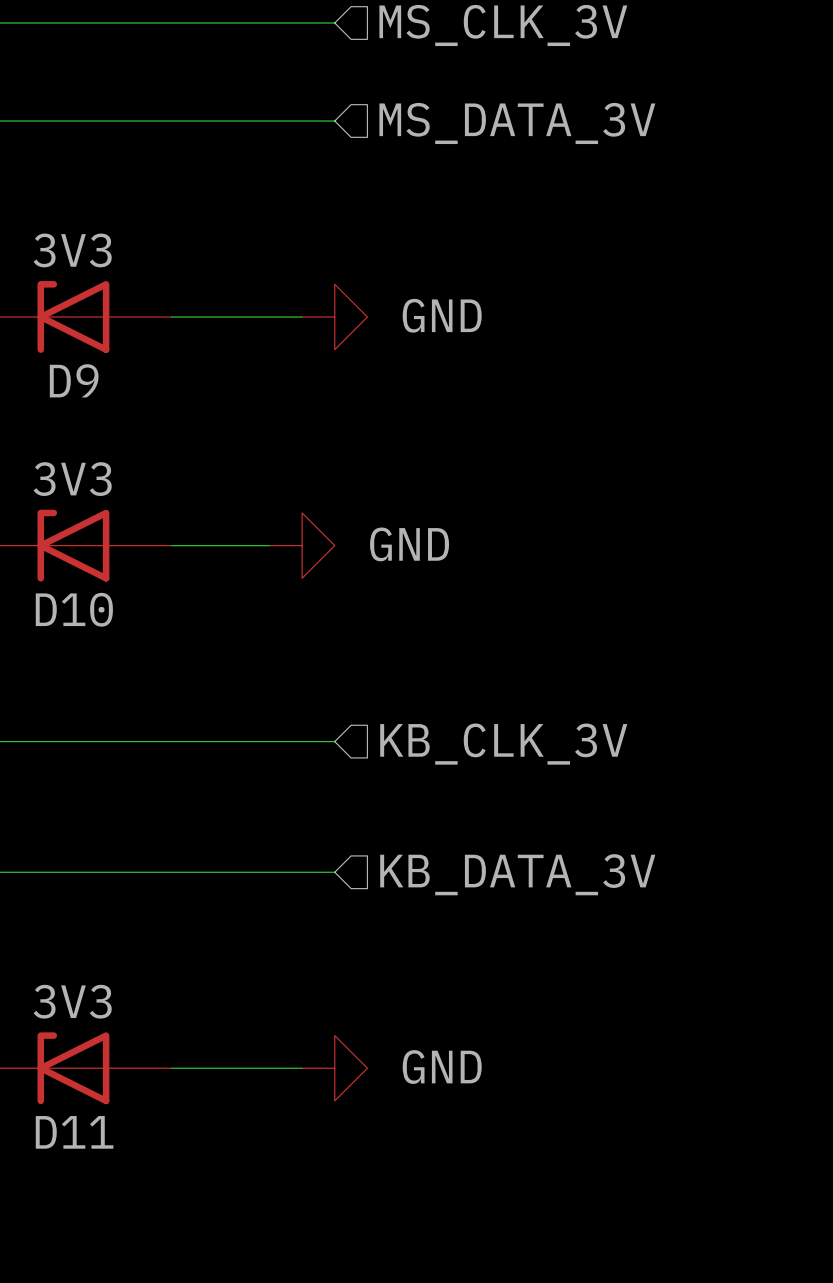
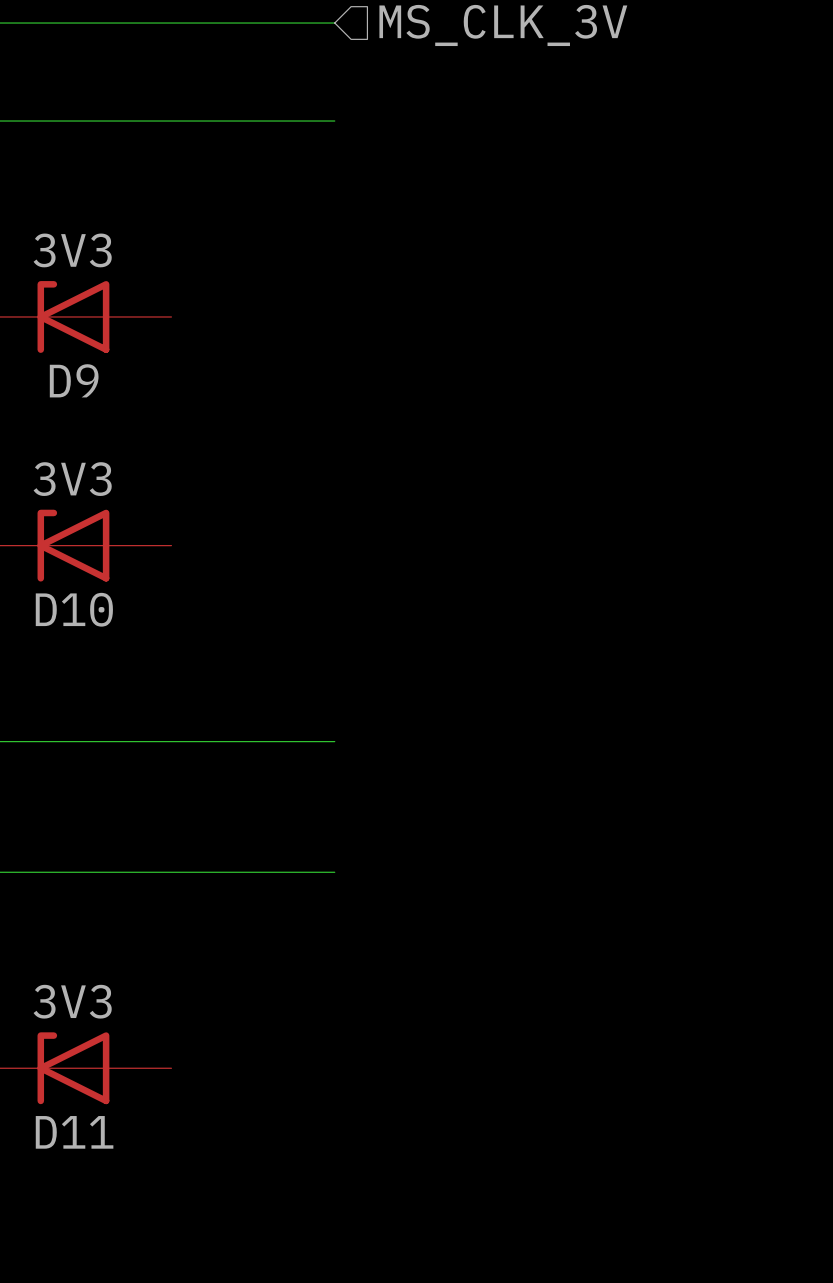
hierarchical label: MS_DATA_3V (517, 123) -> none
wire: (171, 316) (302, 316) -> none
power symbol: GND (334, 316) -> none
wire: (171, 545) (269, 545) -> none
power symbol: GND (302, 545) -> none
hierarchical label: KB_CLK_3V (503, 744) -> none
hierarchical label: KB_DATA_3V (517, 874) -> none
wire: (171, 1068) (302, 1068) -> none
power symbol: GND (334, 1068) -> none

